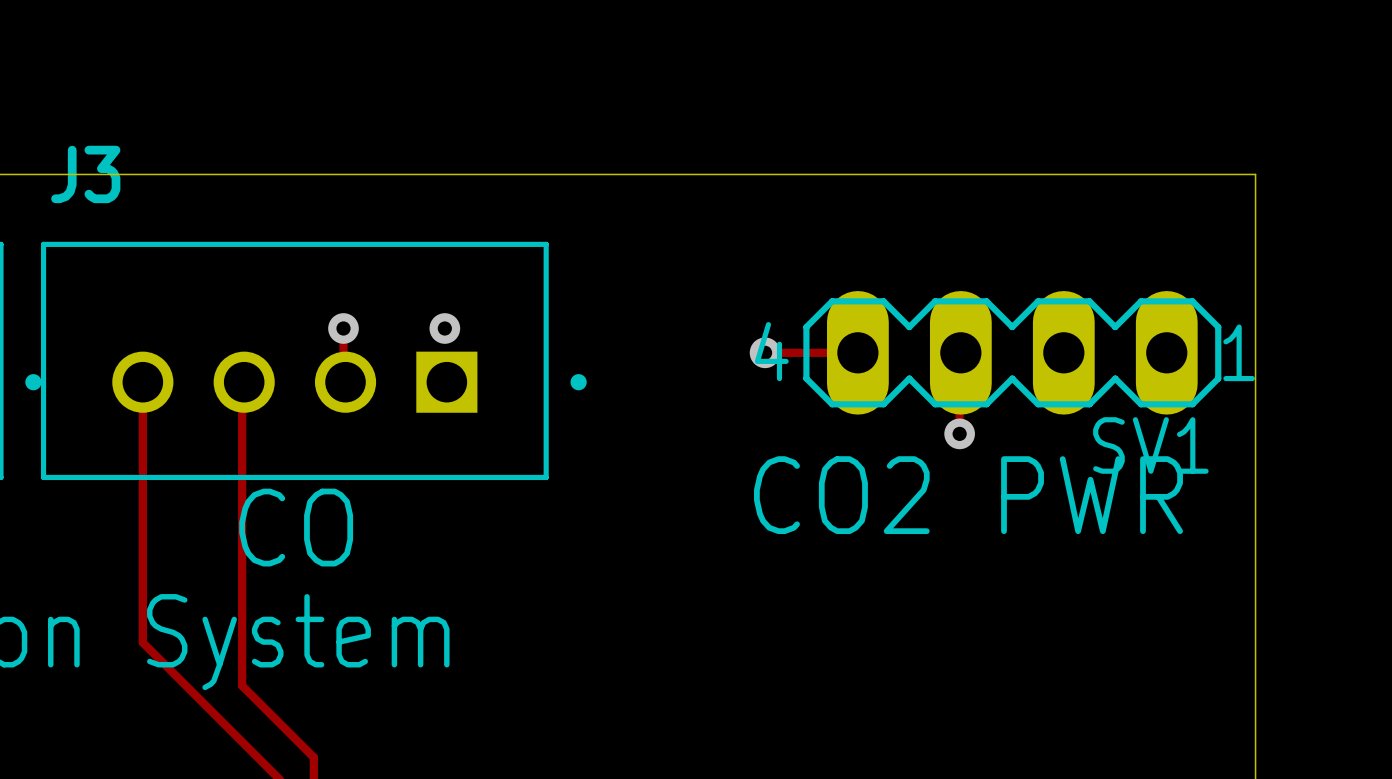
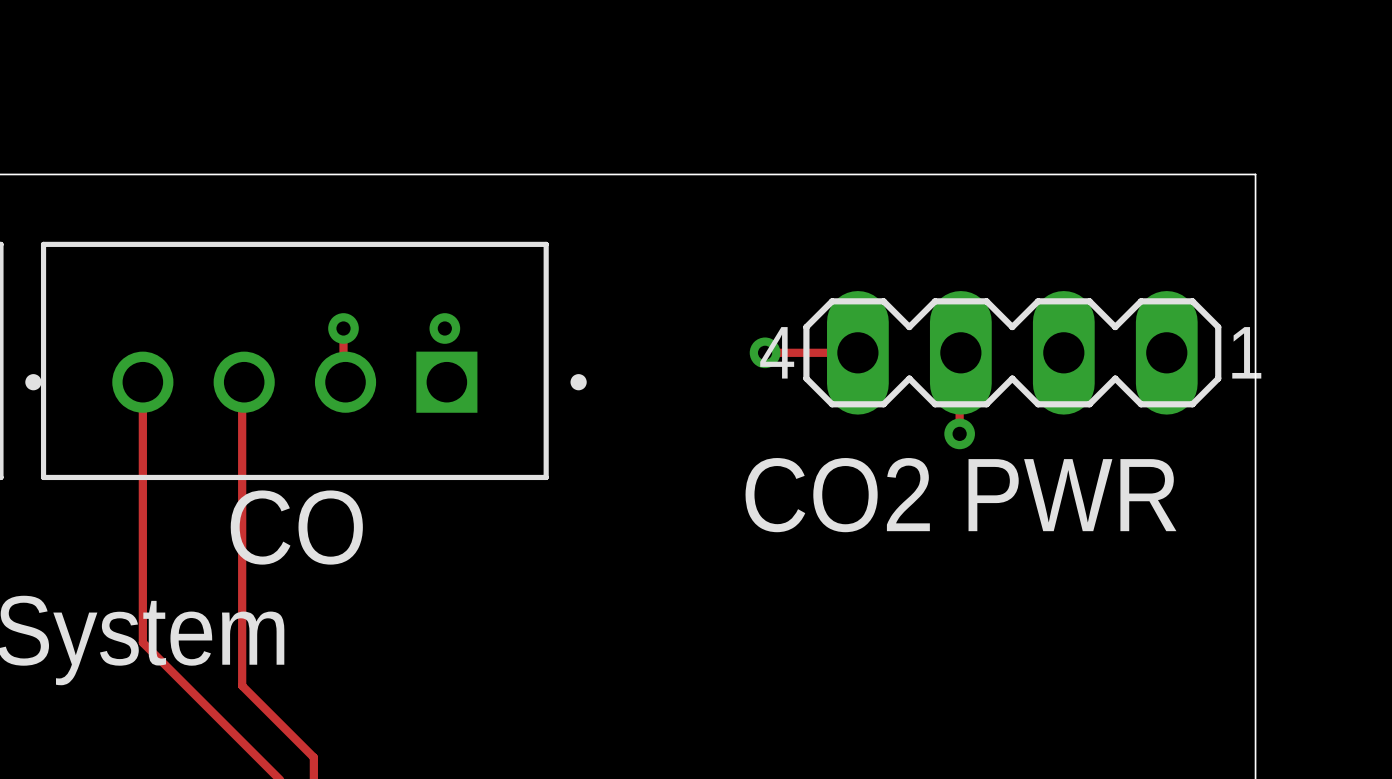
J3 name: J3 (85, 174) -> none
SV1 name: SV1 (1150, 445) -> none

